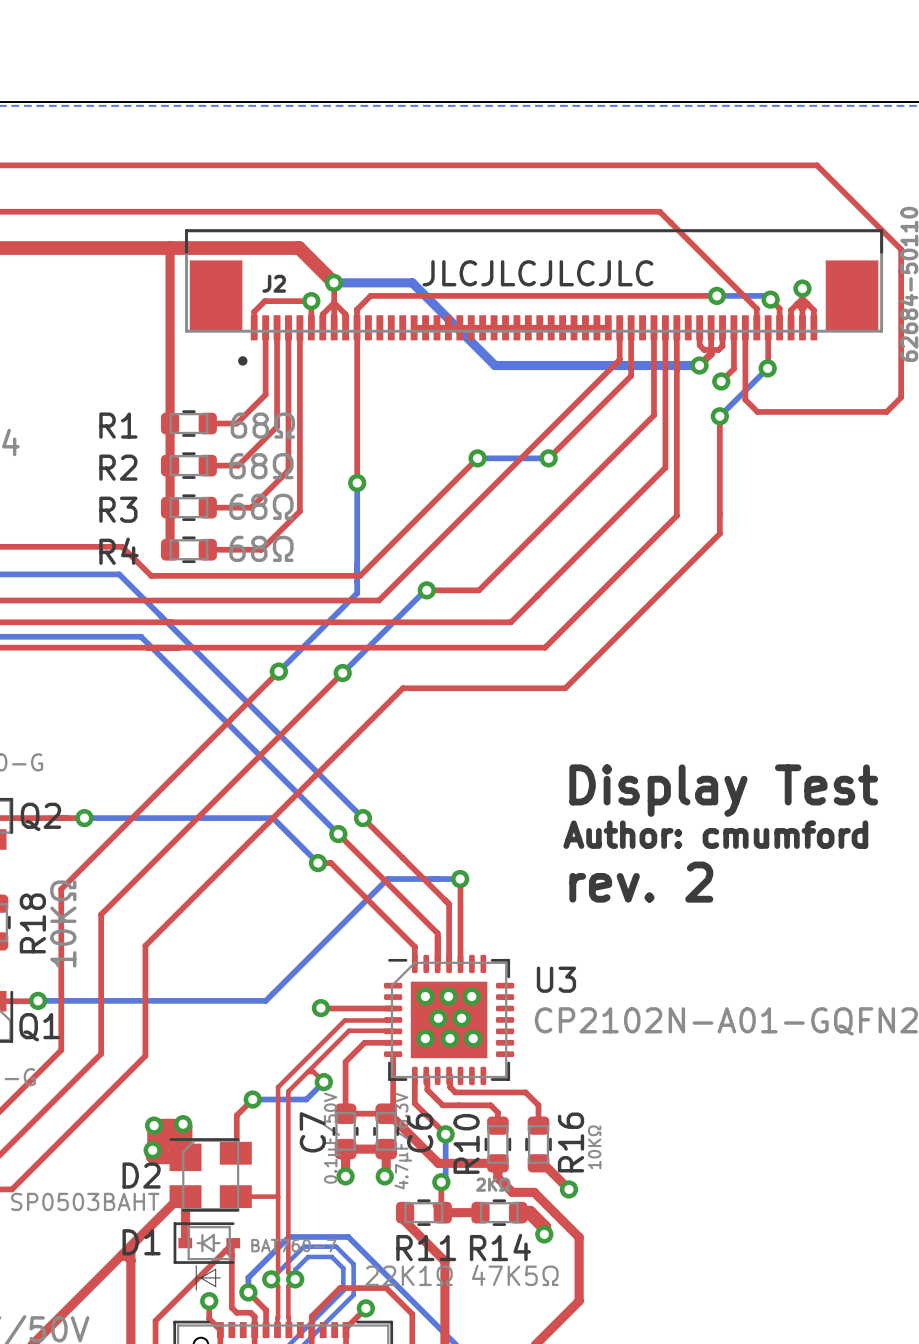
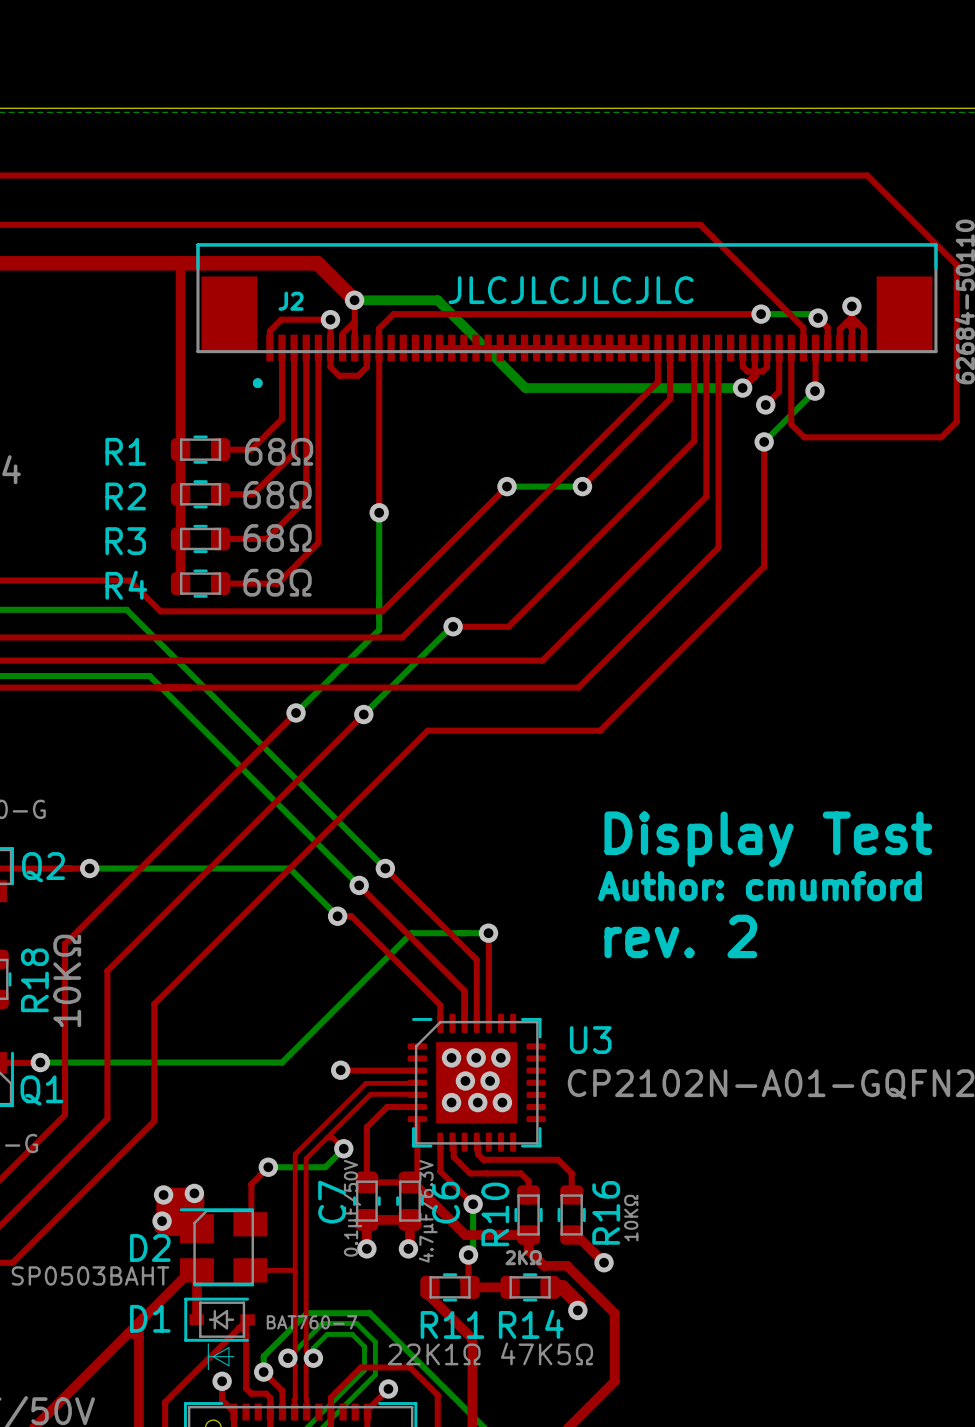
top track: (334, 302) (345, 314) (345, 327) -> (330, 348) (330, 367) (339, 375) (358, 375) (366, 367) (366, 348)

